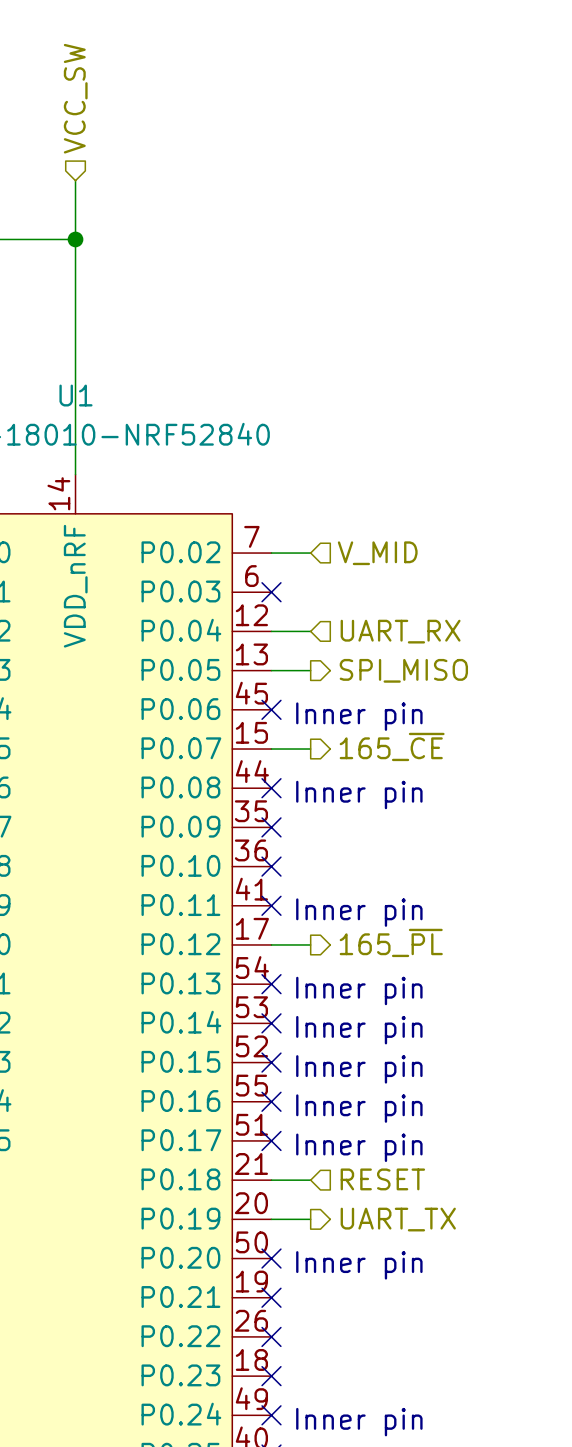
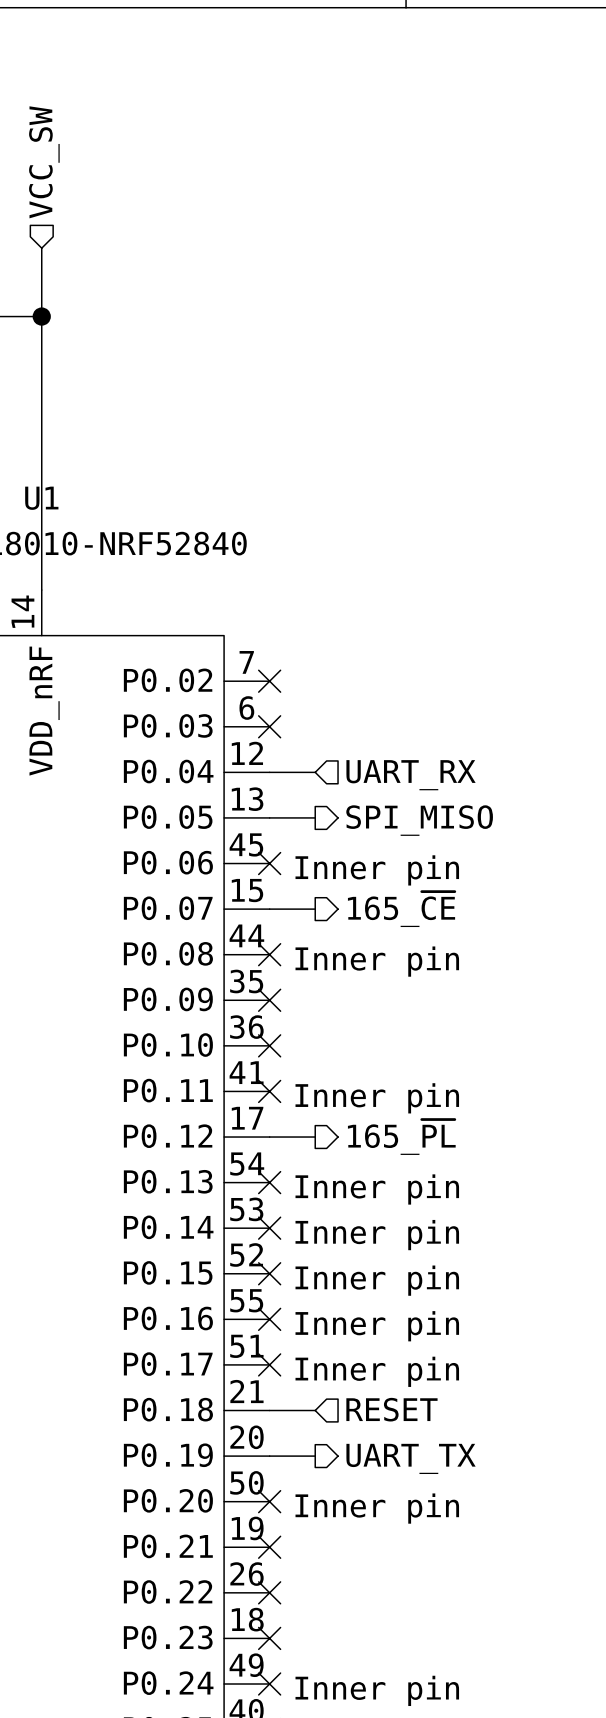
wire: (271, 553) (310, 553) -> none
no-connect mark: none -> (269, 681)
hierarchical label: V_MID (377, 553) -> none

